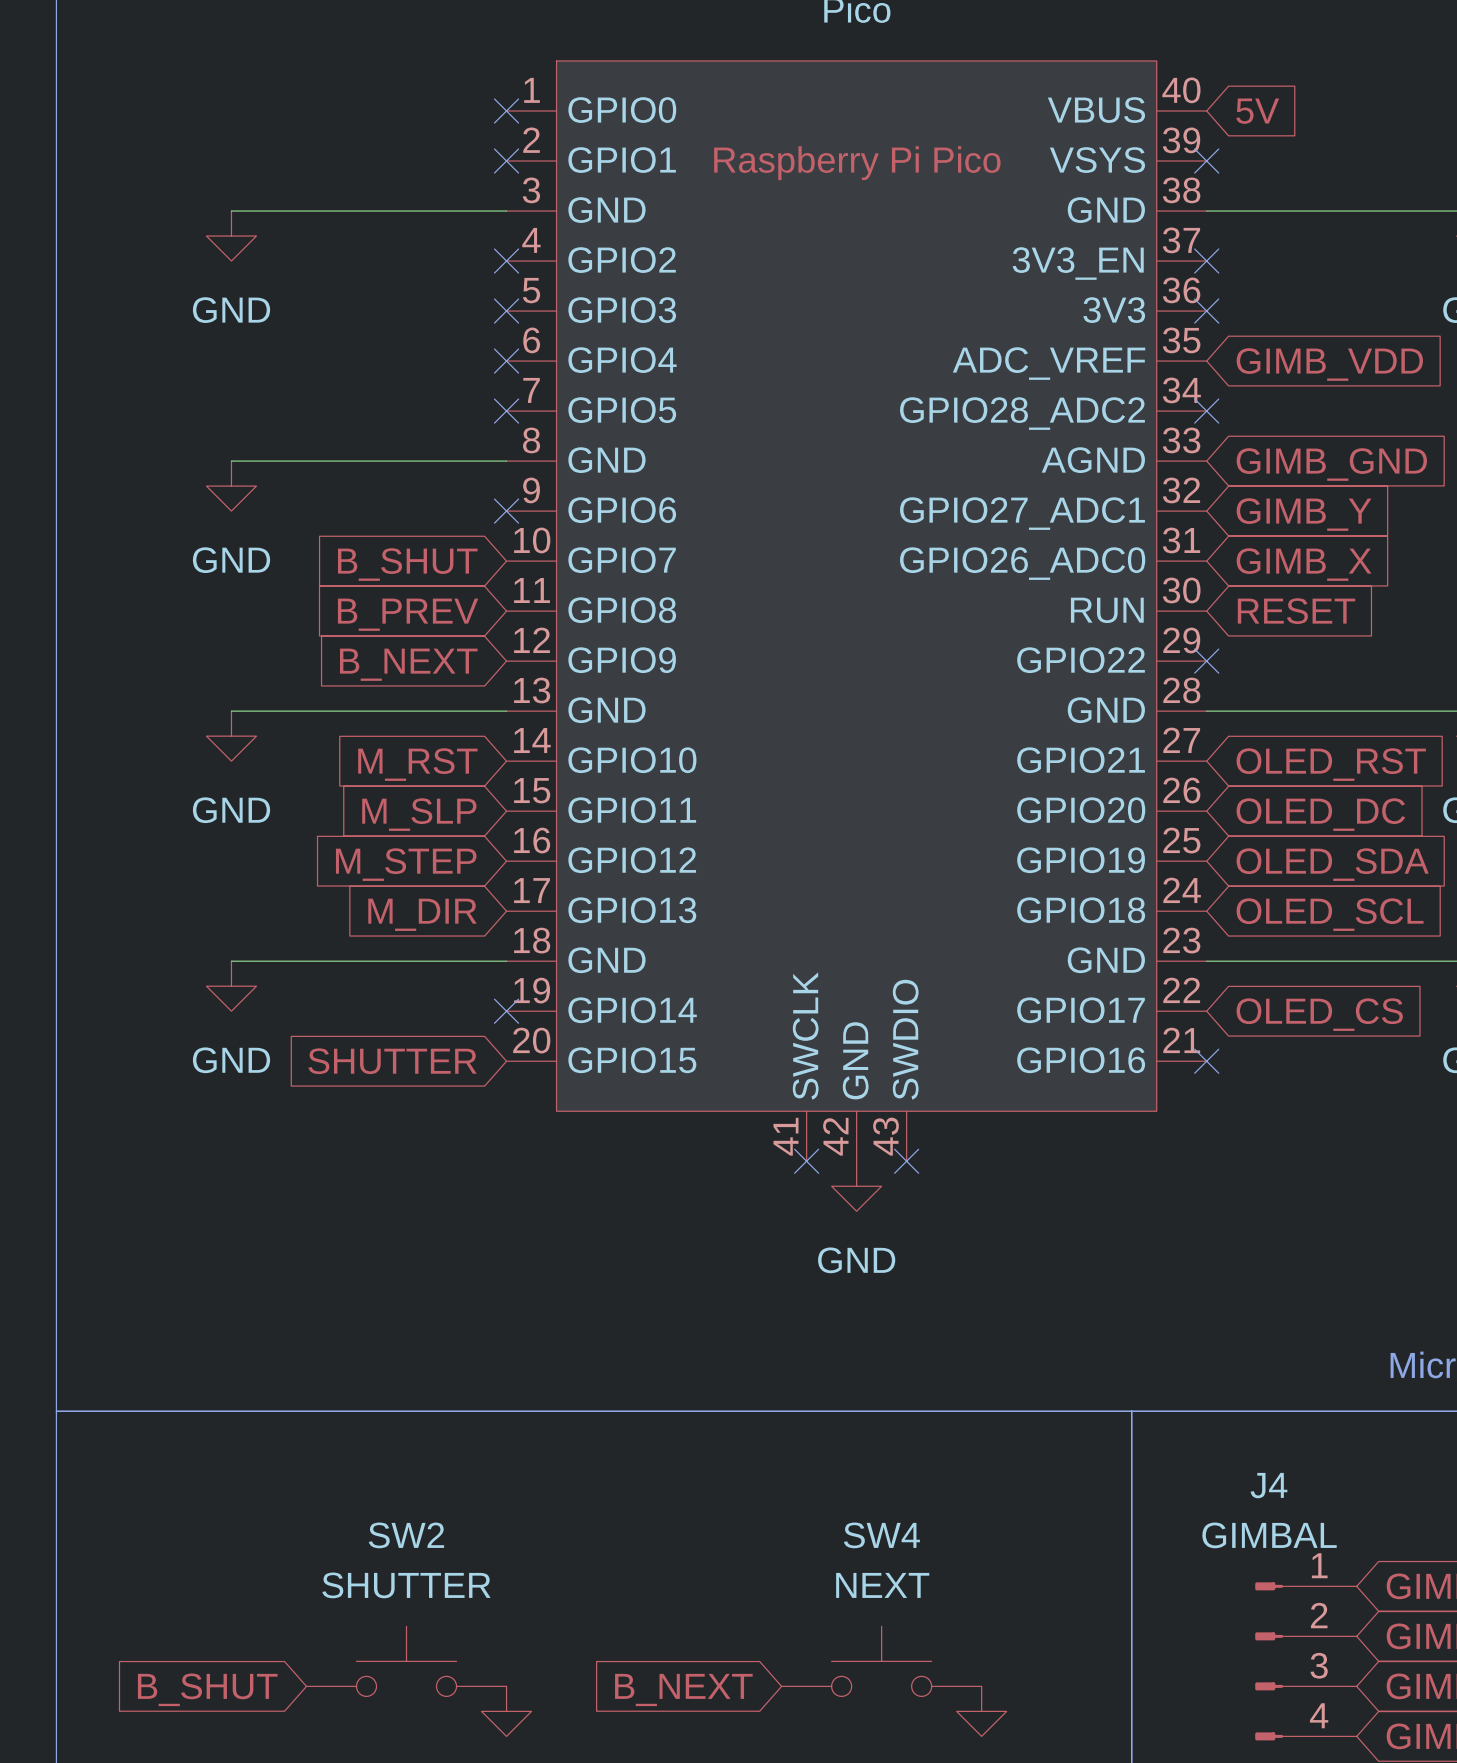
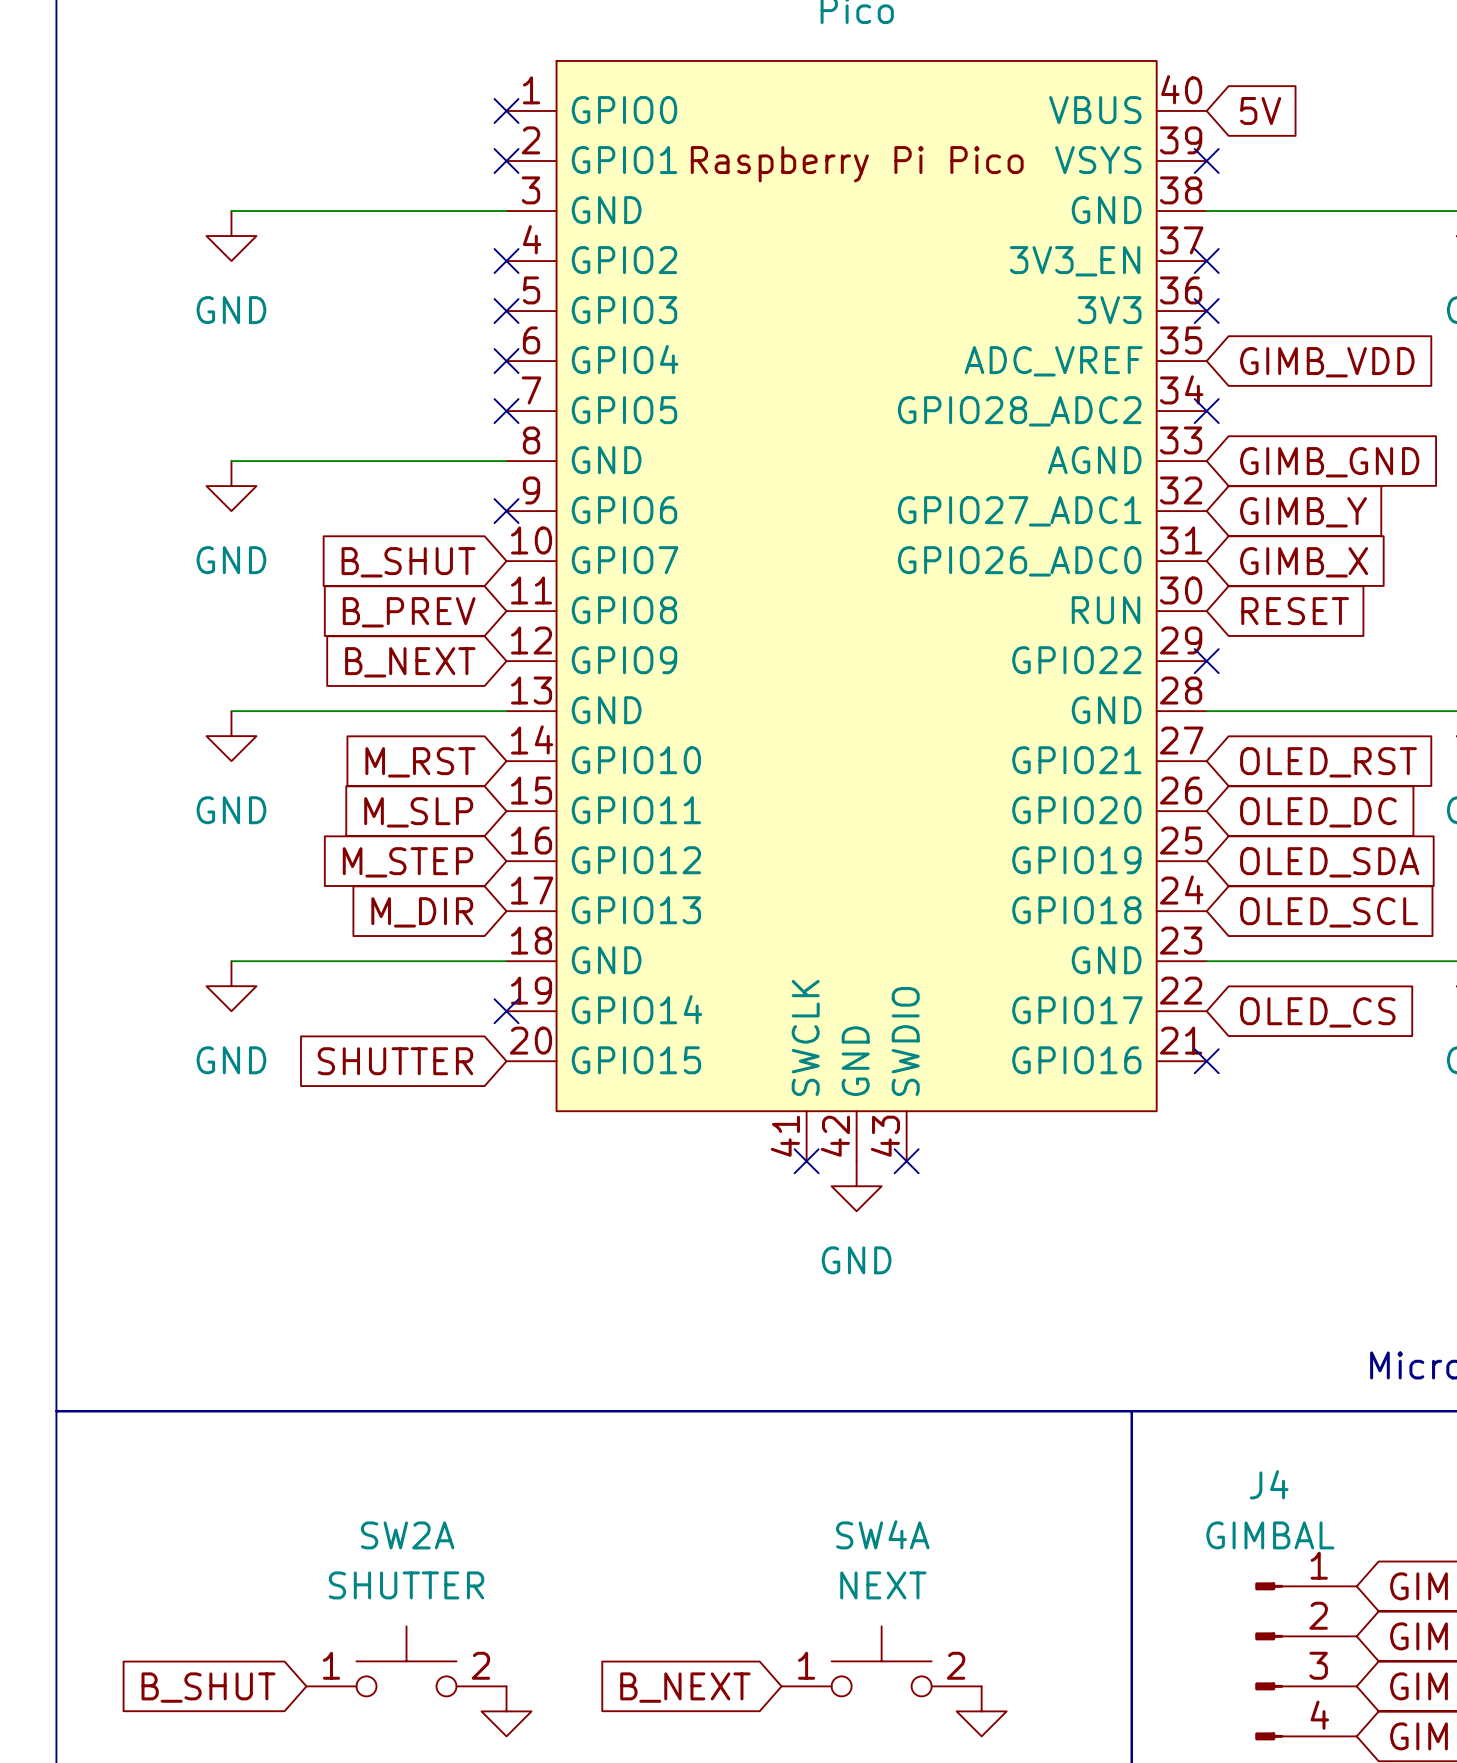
SW2 name: SW2 (406, 1535) -> SW2A (407, 1535)
SW4 name: SW4 (881, 1535) -> SW4A (882, 1534)
SW2 pin number: none -> 1 (331, 1665)
SW2 pin number: none -> 2 (480, 1665)
SW4 pin number: none -> 1 (806, 1665)
SW4 pin number: none -> 2 (956, 1665)

